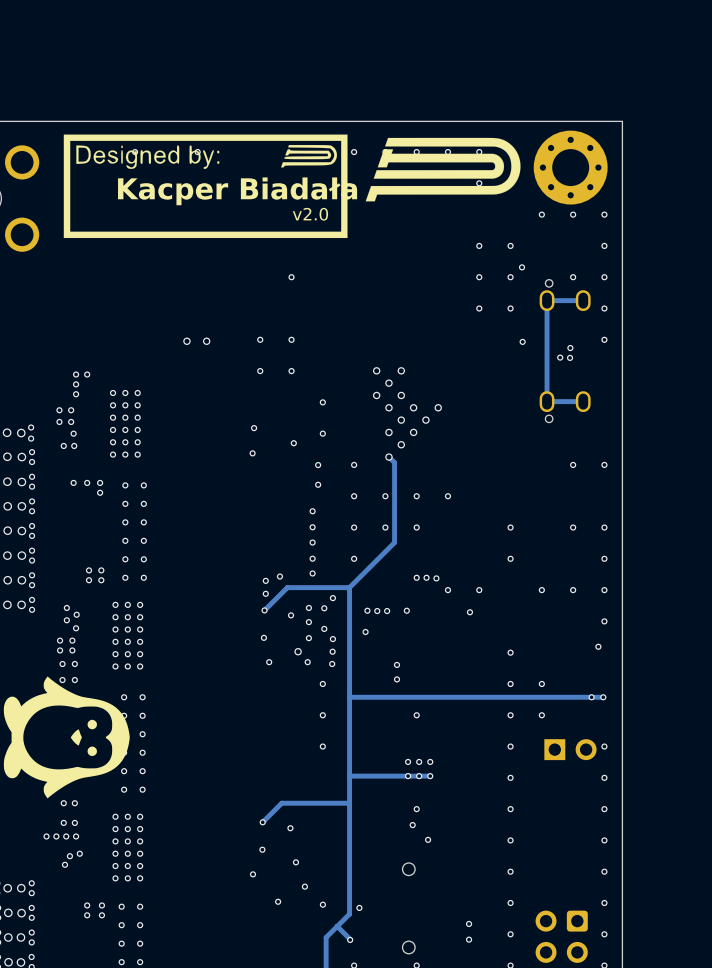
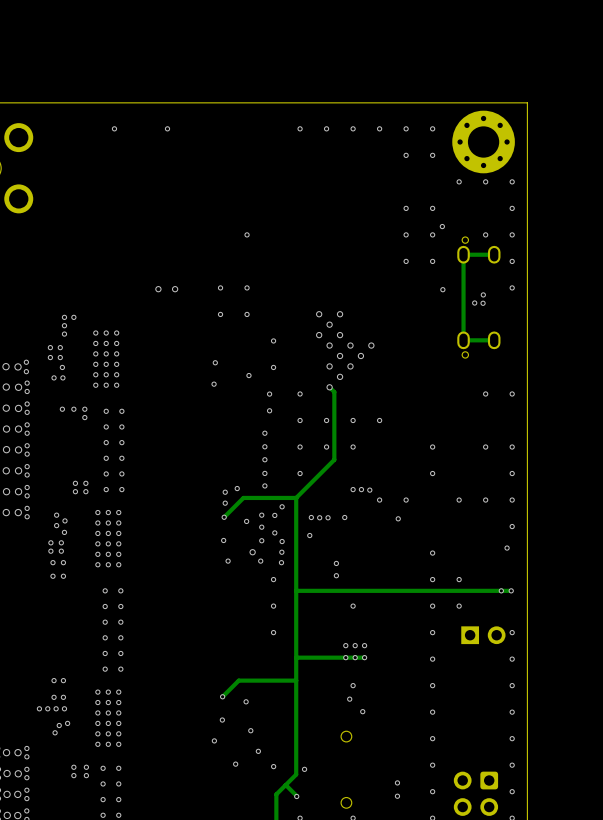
drawing: [63, 134, 348, 239] -> none
drawing: [365, 137, 521, 202] -> none
text: Kacper Biadała (237, 191) -> none
text: v2.0 (310, 214) -> none
drawing: [3, 676, 130, 799] -> none

